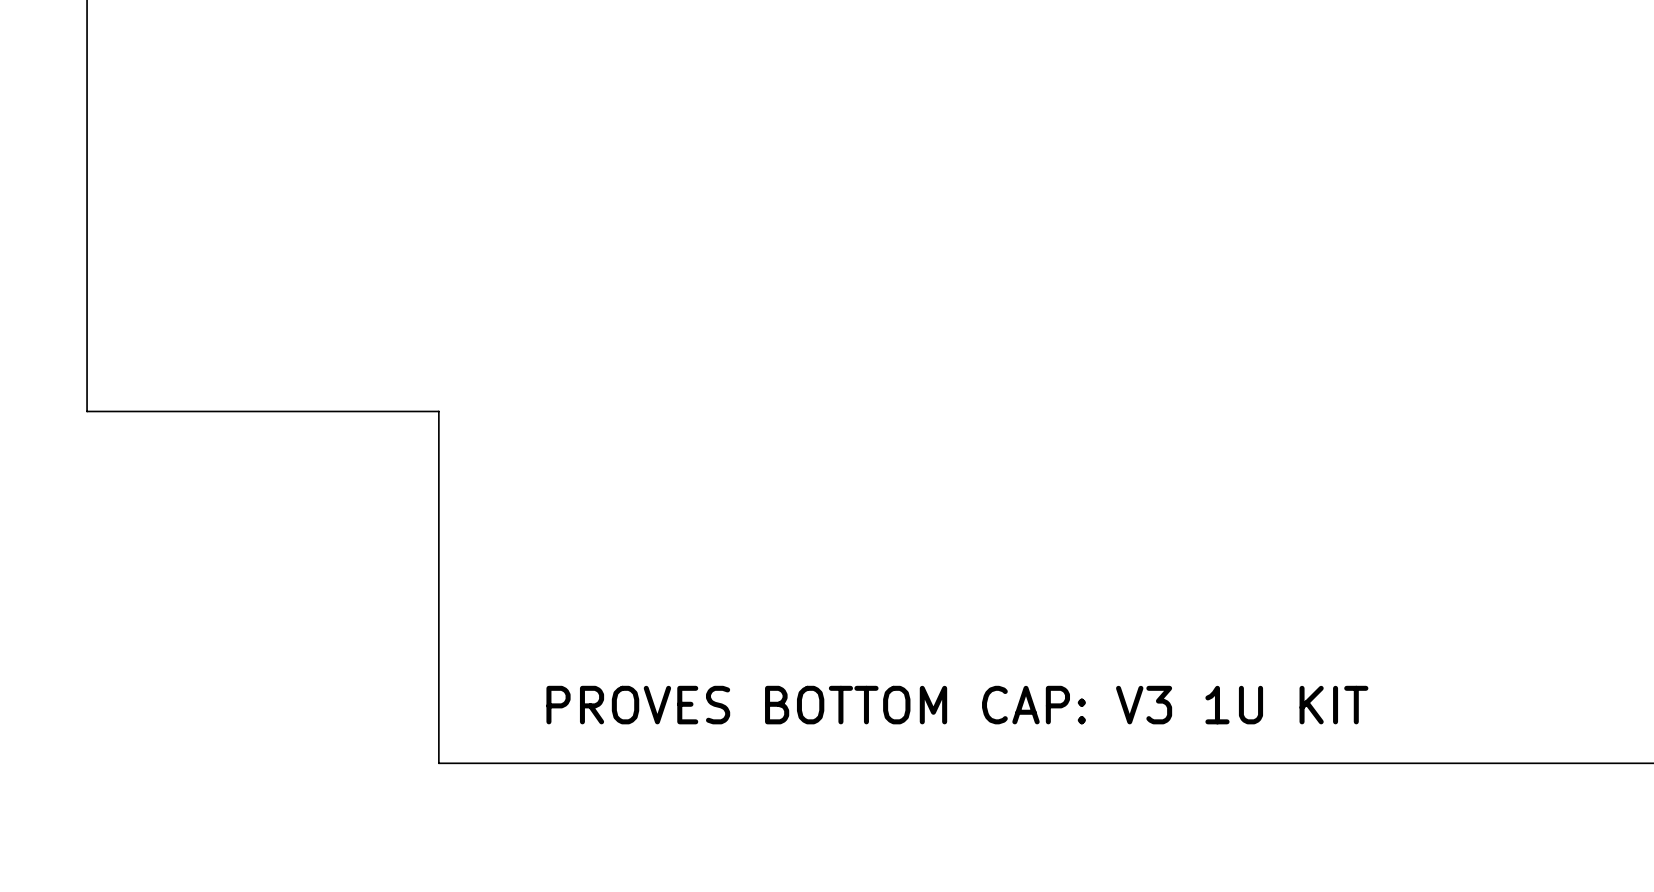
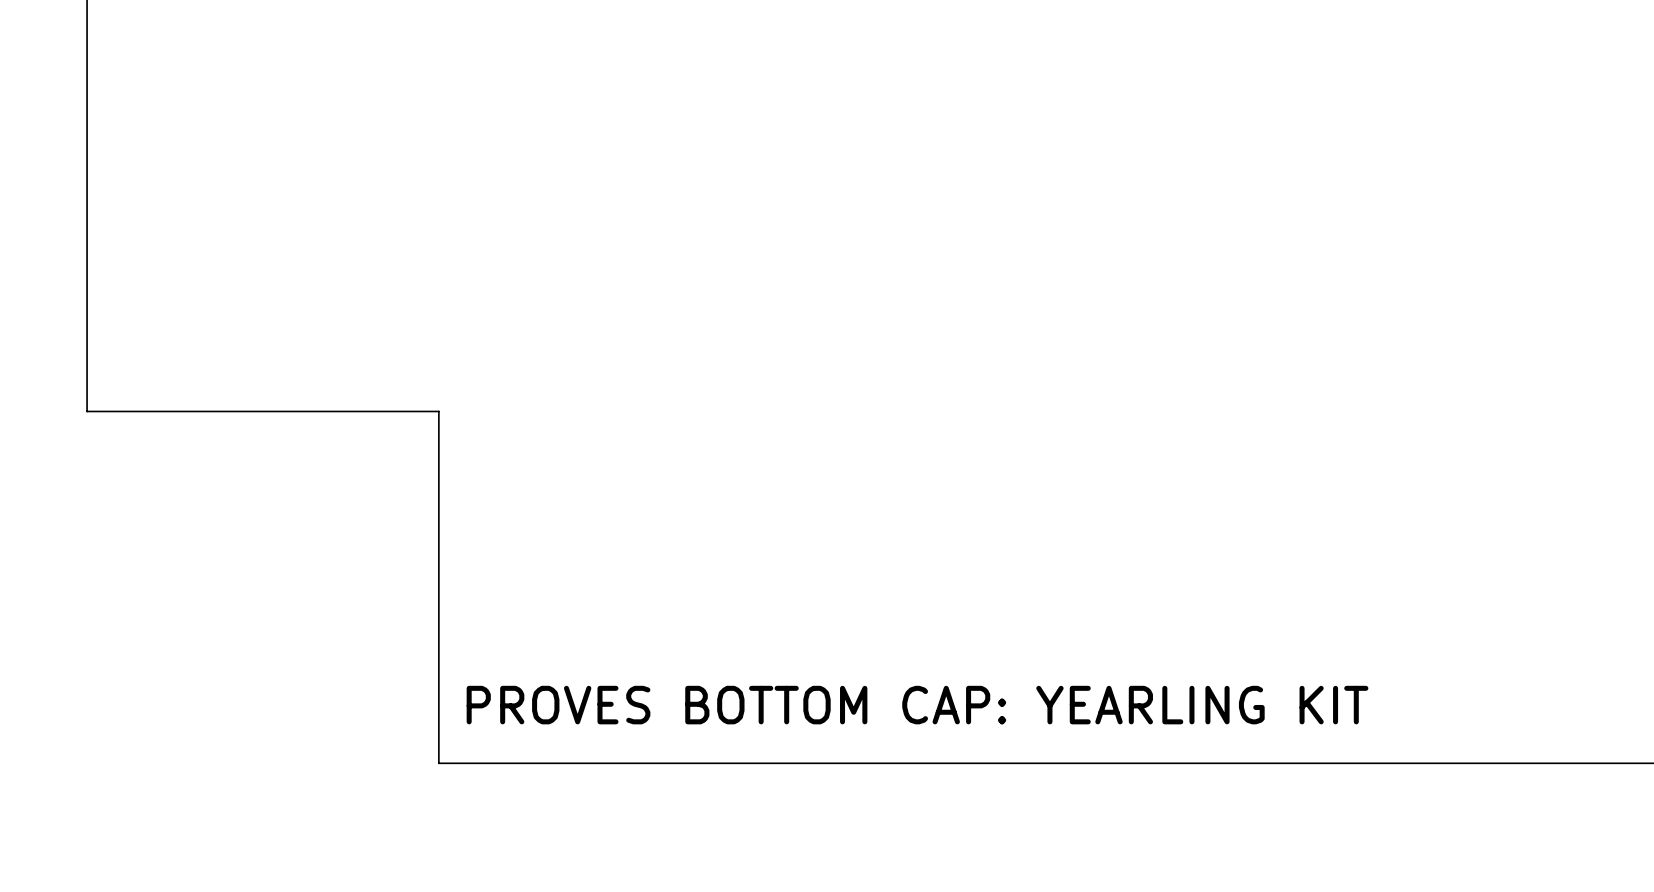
text: PROVES BOTTOM CAP: V3 1U KIT (957, 705) -> PROVES BOTTOM CAP: YEARLING KIT (917, 705)

